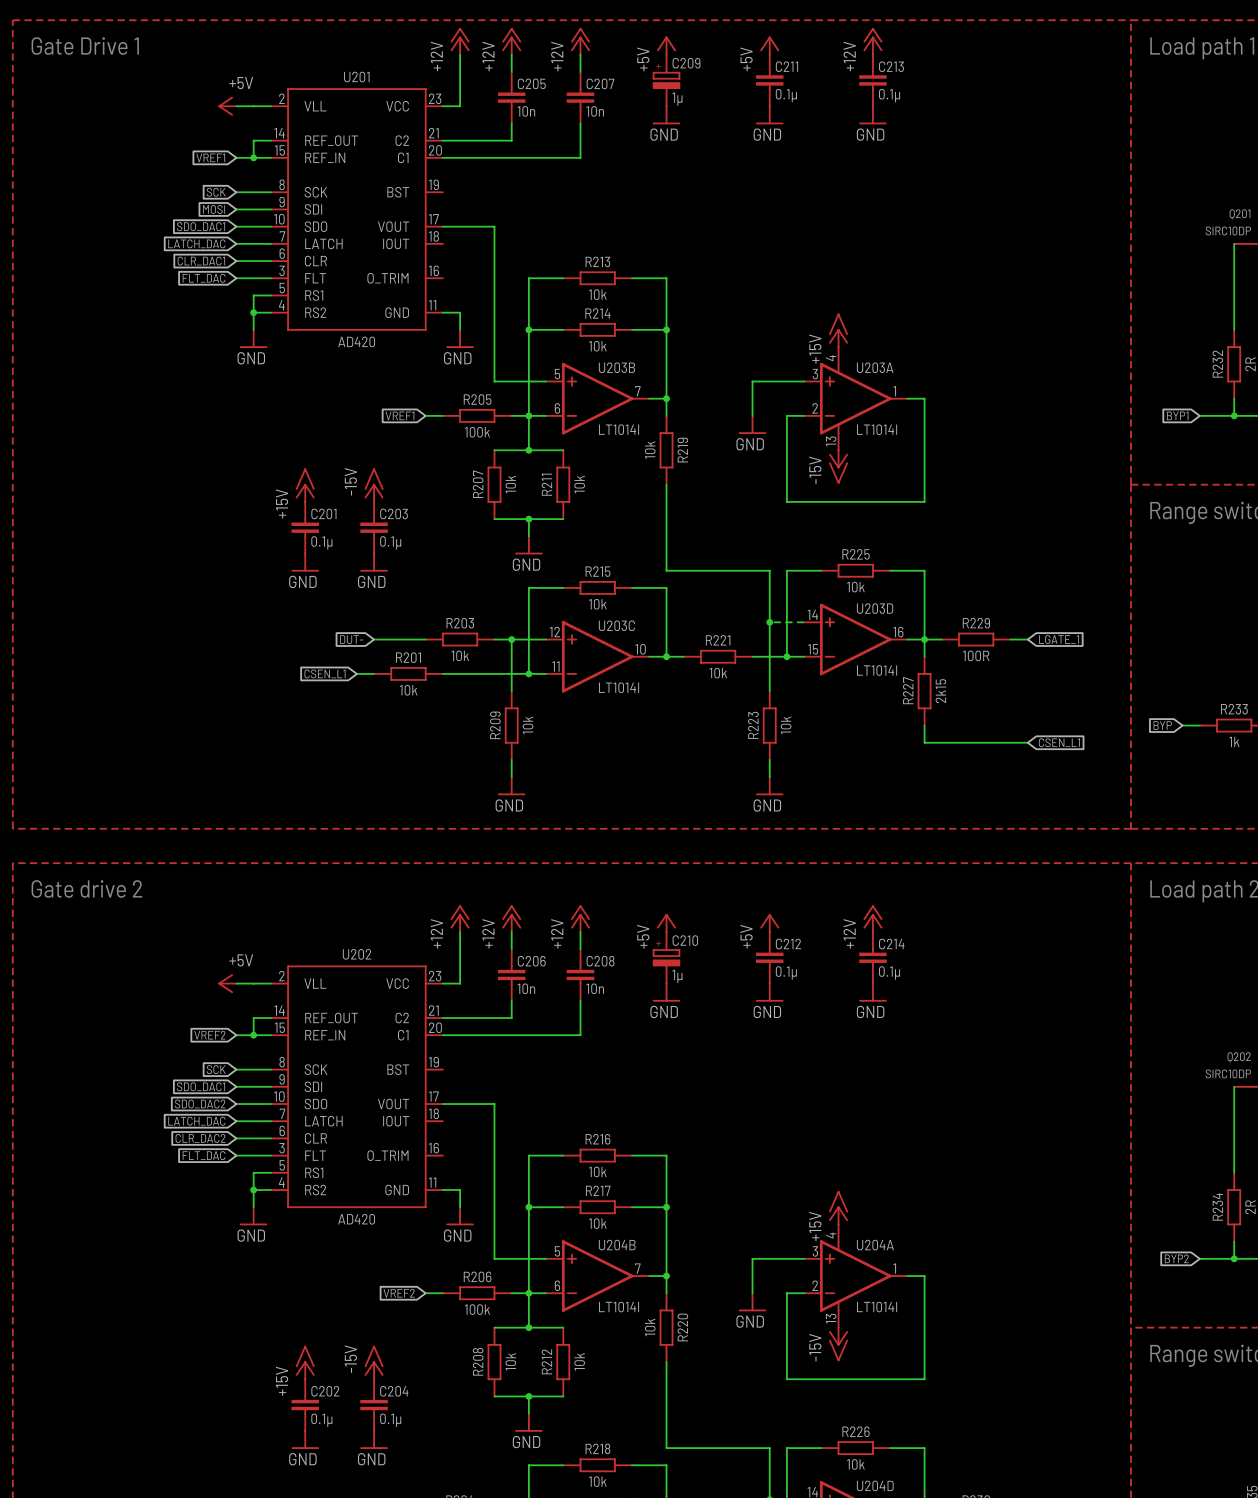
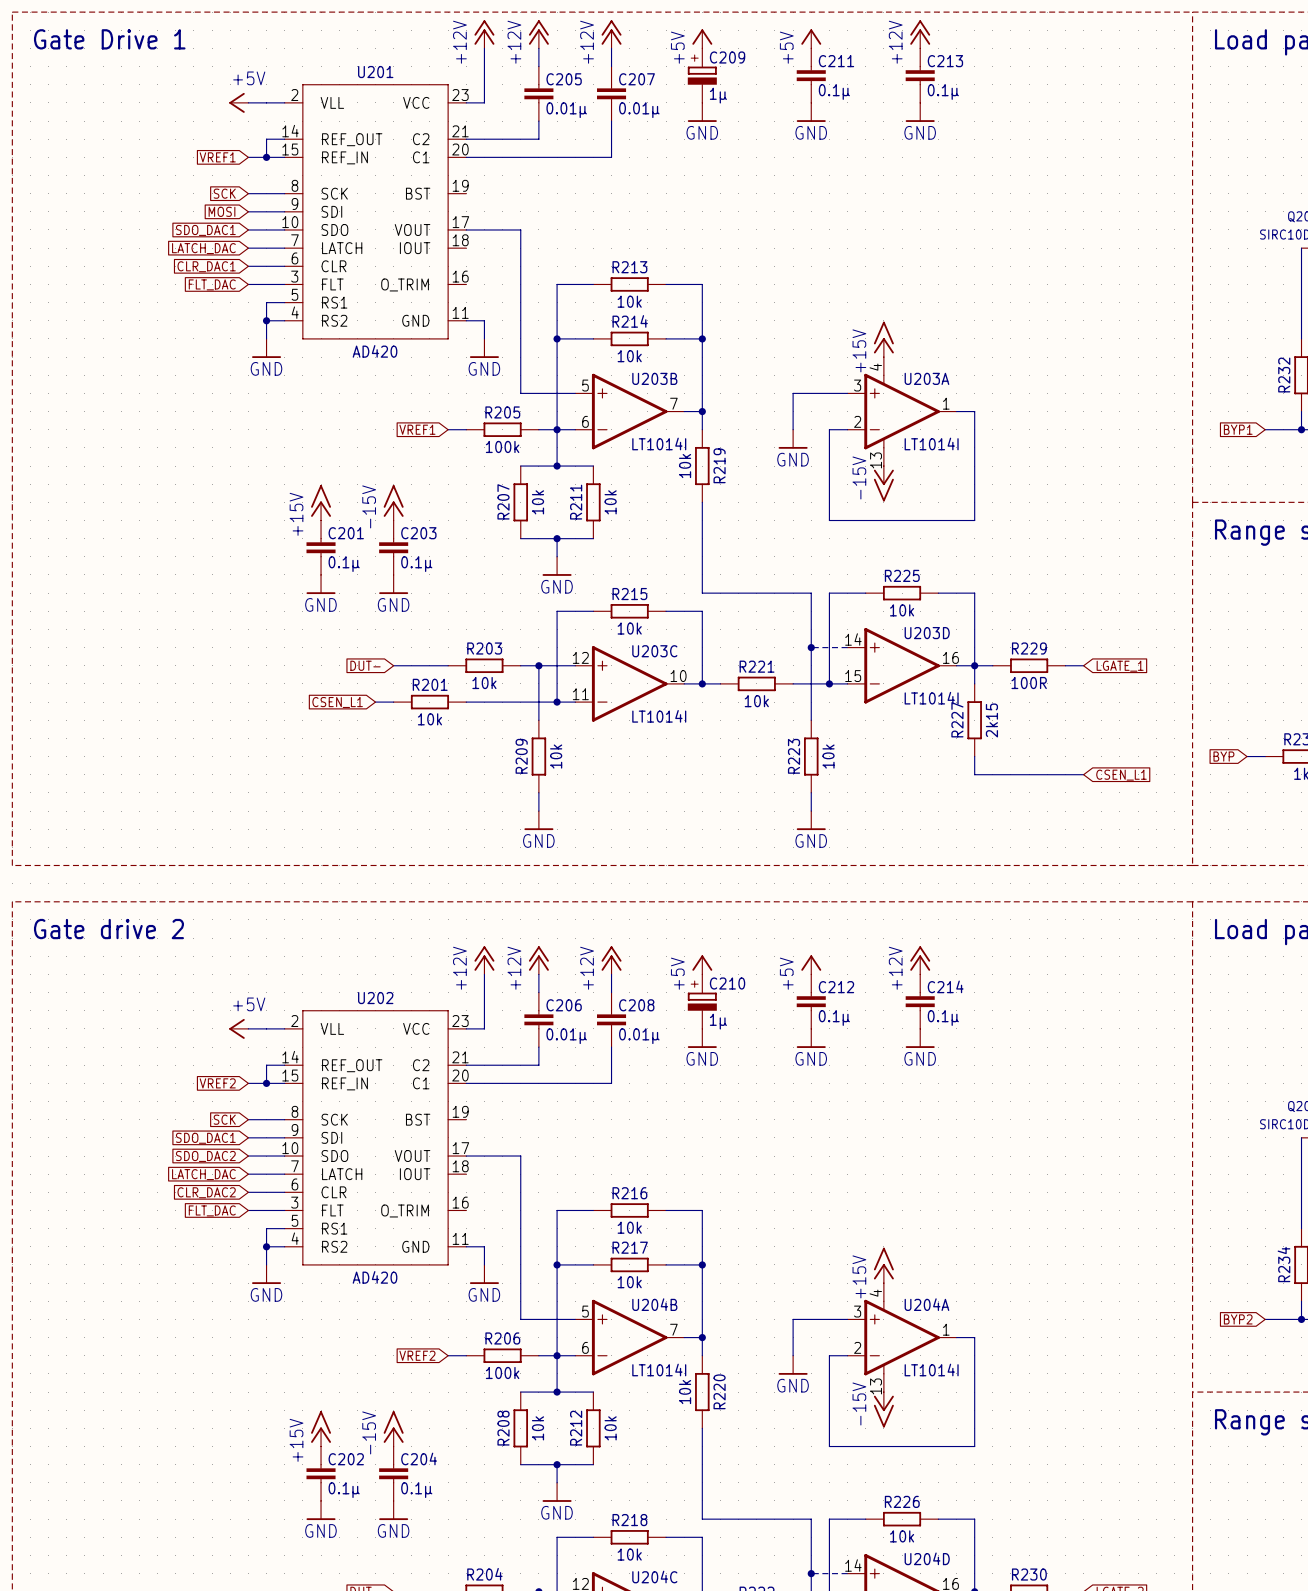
C205 value: 10n (526, 111) -> 0.01µ (566, 110)
C207 value: 10n (595, 111) -> 0.01µ (639, 110)
C206 value: 10n (526, 988) -> 0.01µ (566, 1036)
C208 value: 10n (595, 988) -> 0.01µ (639, 1036)

